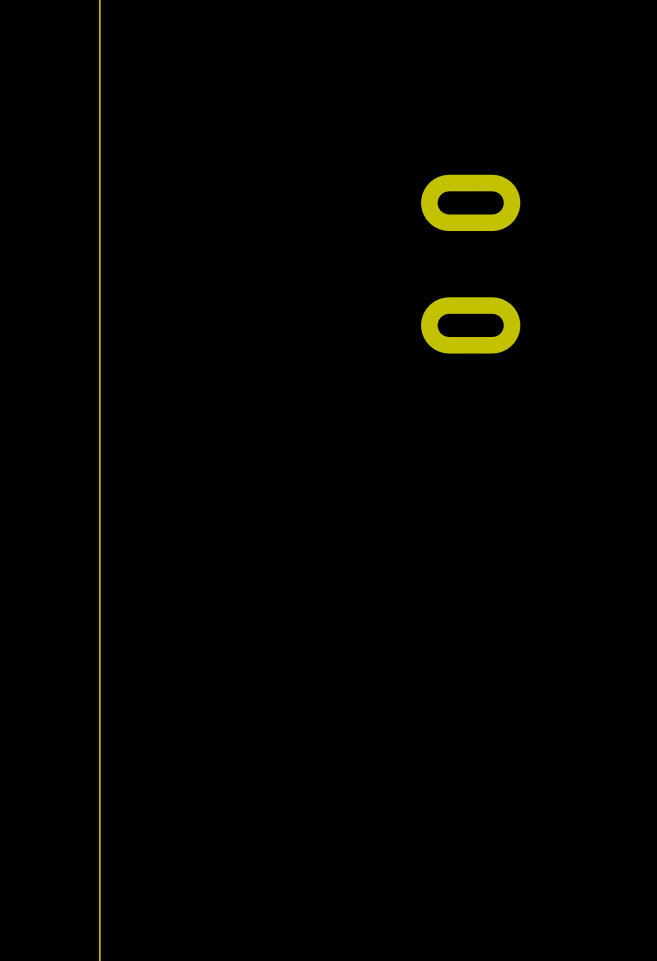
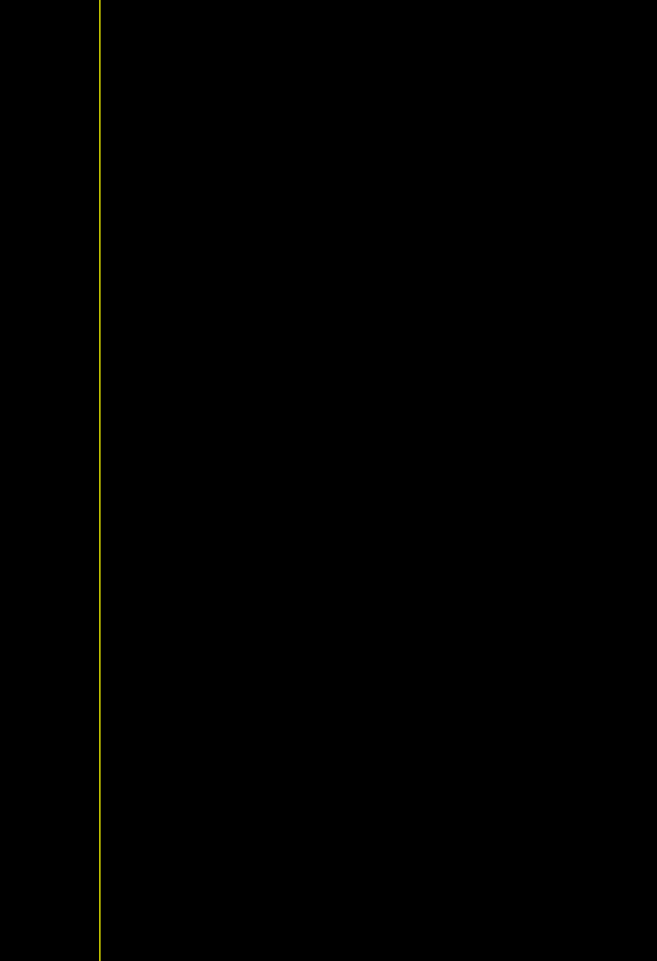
part: (470, 264) -> none

